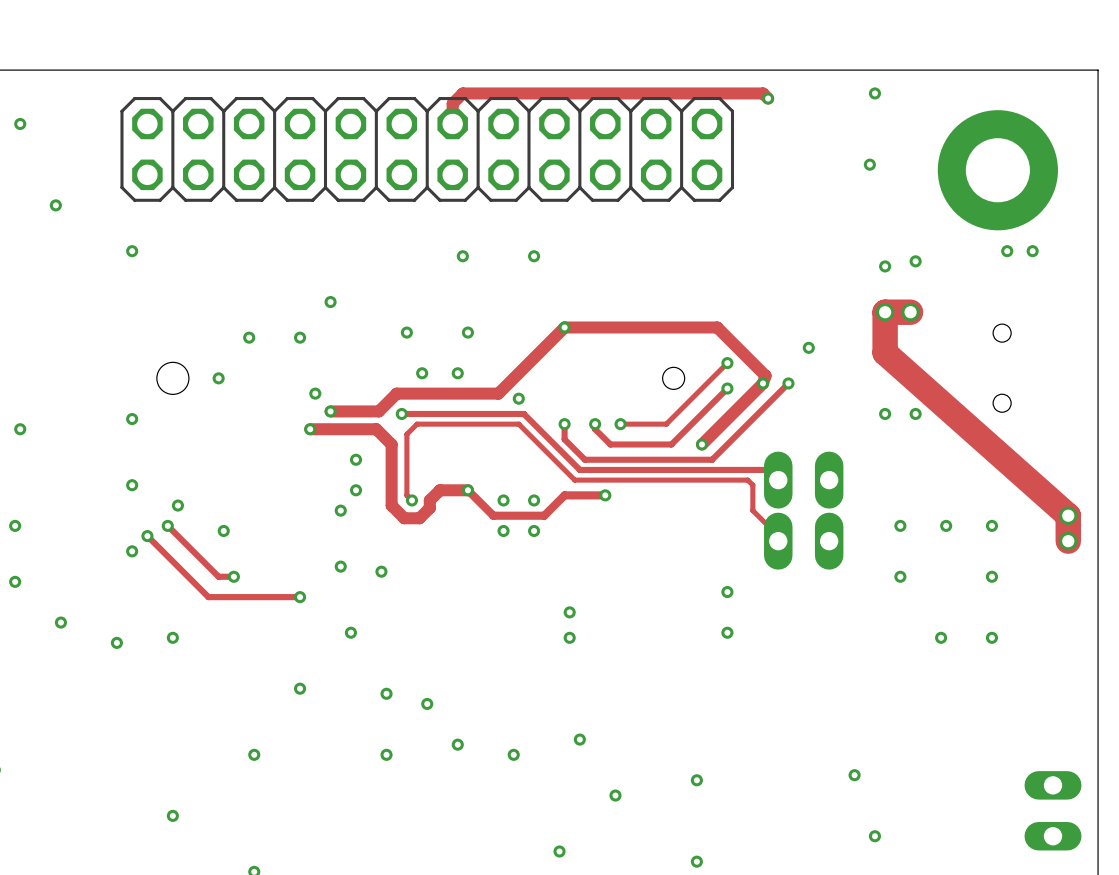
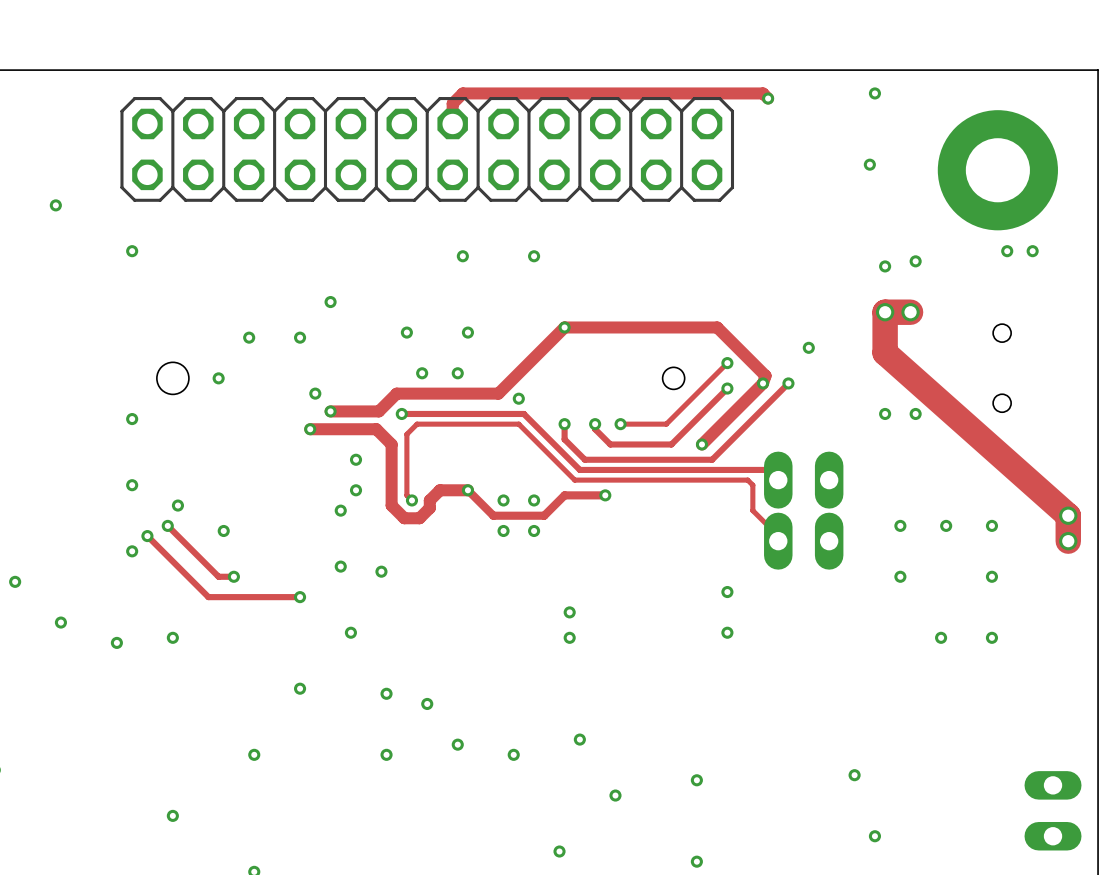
via: (20, 123) -> none
via: (20, 429) -> none
via: (15, 525) -> none

